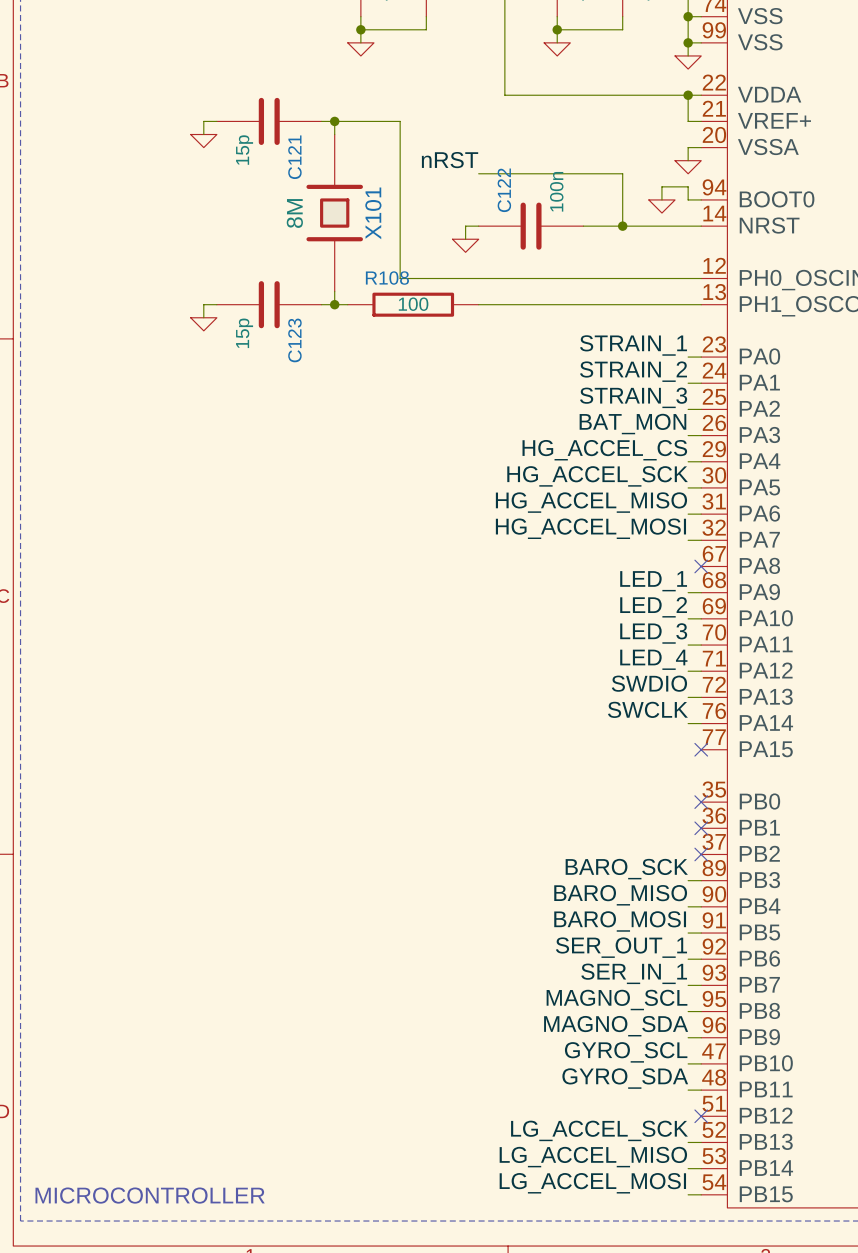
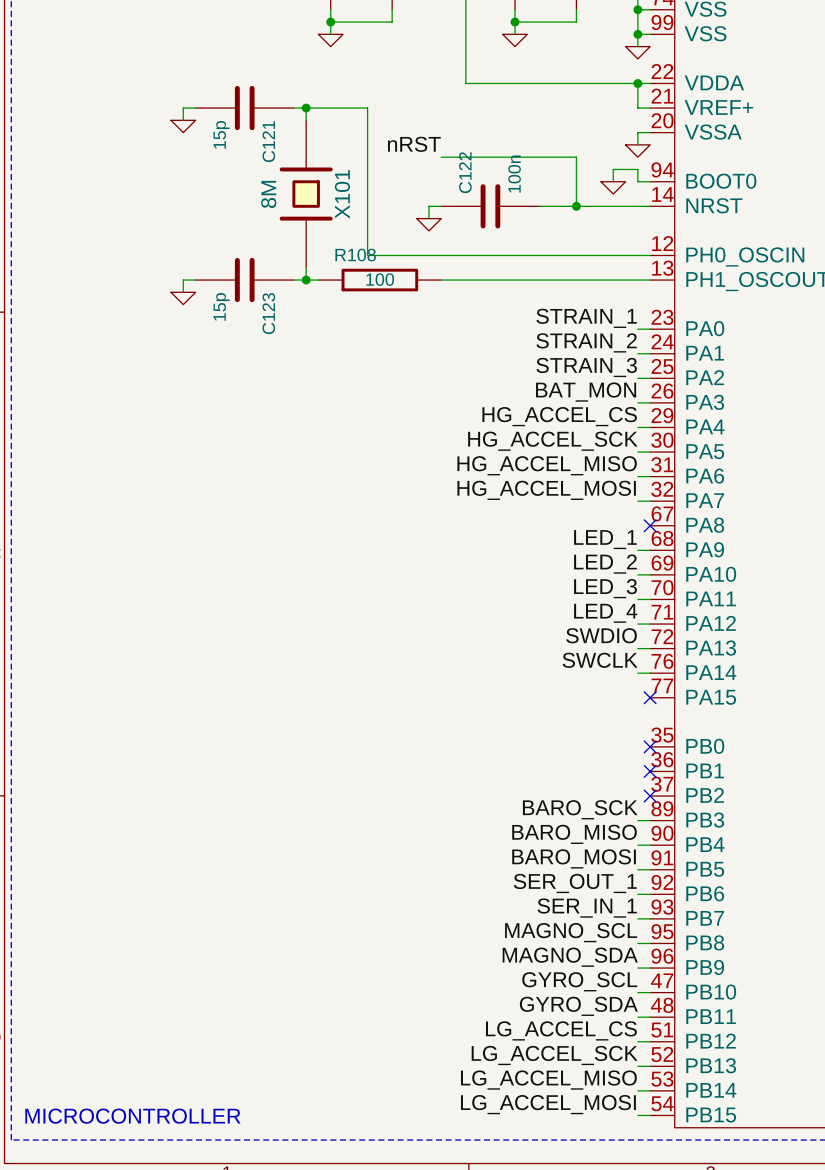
label: none -> LG_ACCEL_CS (561, 1030)
wire: none -> (637, 1041) (650, 1041)
no-connect mark: (701, 1116) -> none

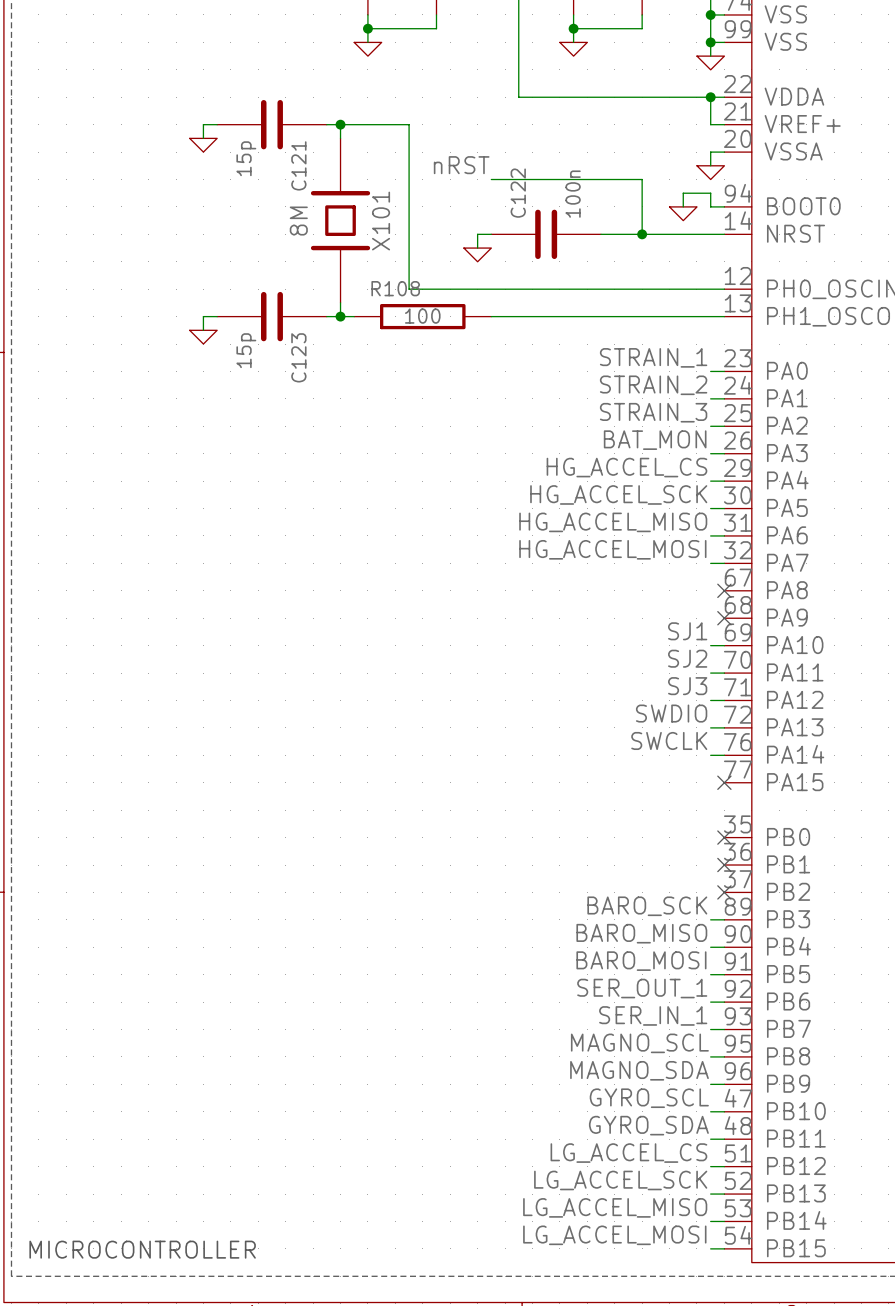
label: LED_1 (605, 539) -> none
wire: (637, 550) (650, 550) -> none
no-connect mark: none -> (724, 618)
label: LED_2 (605, 564) -> SJ1 (687, 631)
label: LED_3 (605, 588) -> SJ2 (687, 658)
label: LED_4 (605, 613) -> SJ3 (687, 686)

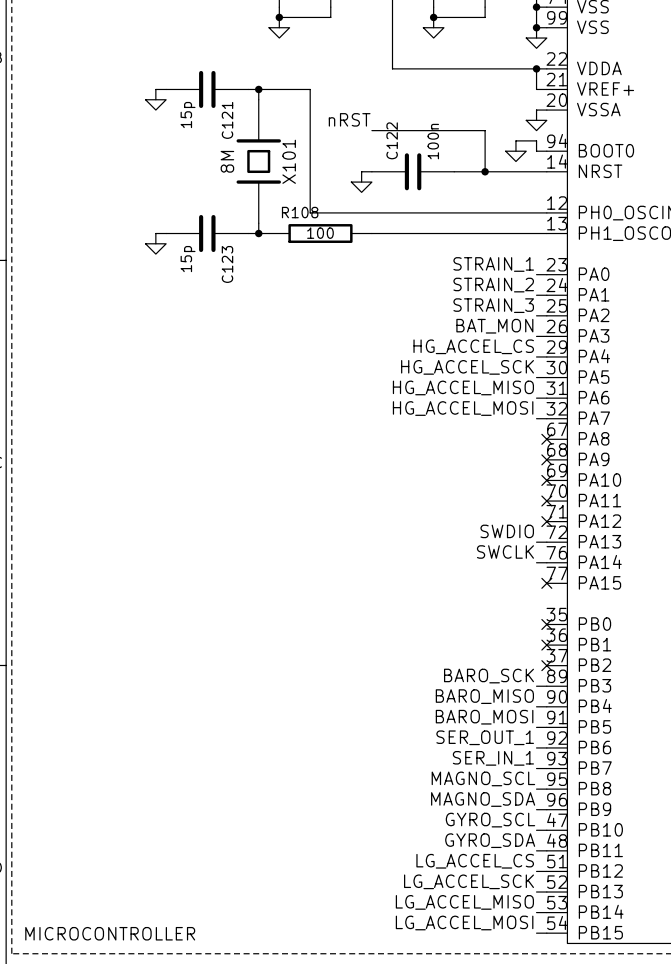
label: SJ1 (687, 631) -> none
wire: (710, 645) (724, 645) -> none
no-connect mark: none -> (546, 480)
label: SJ2 (687, 658) -> none
wire: (710, 673) (724, 673) -> none
no-connect mark: none -> (546, 501)
label: SJ3 (687, 686) -> none
wire: (710, 700) (724, 700) -> none
no-connect mark: none -> (546, 521)

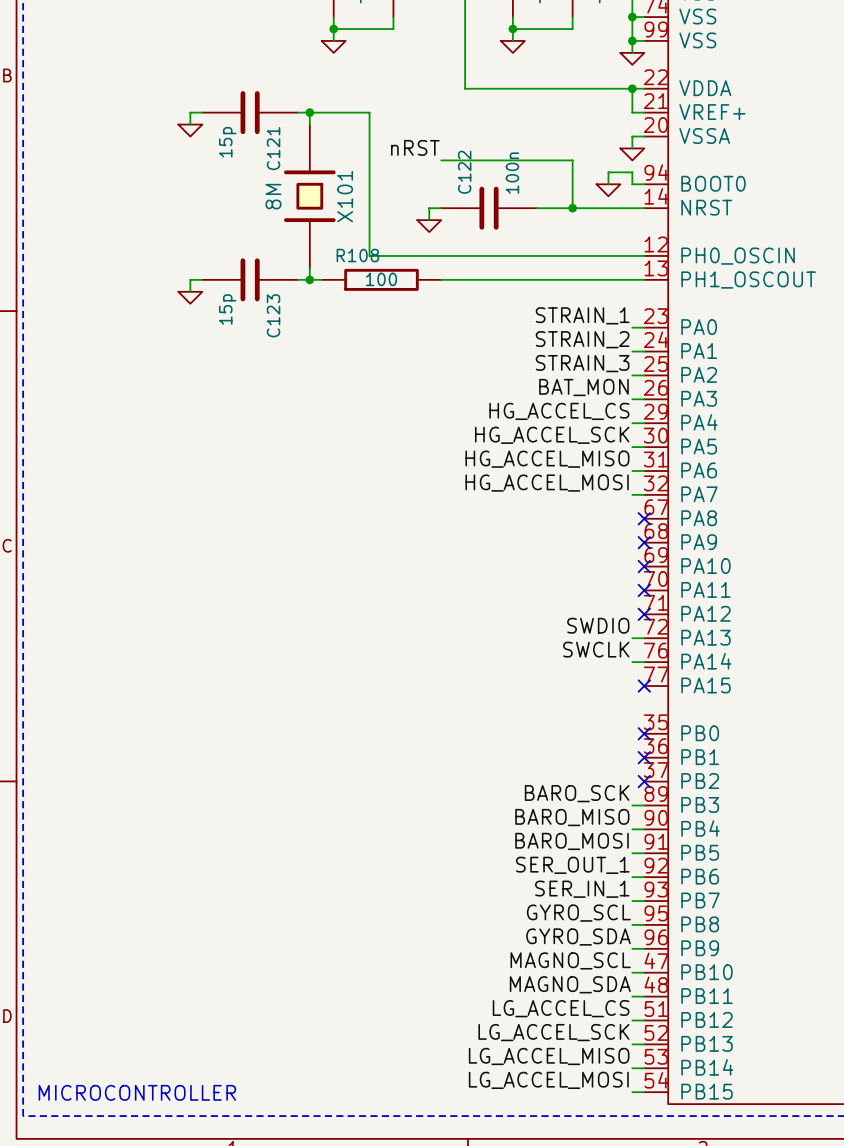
label: MAGNO_SCL (483, 778) -> GYRO_SCL (578, 913)
label: MAGNO_SDA (483, 799) -> GYRO_SDA (578, 937)
label: GYRO_SCL (490, 820) -> MAGNO_SCL (570, 960)
label: GYRO_SDA (490, 840) -> MAGNO_SDA (570, 984)

